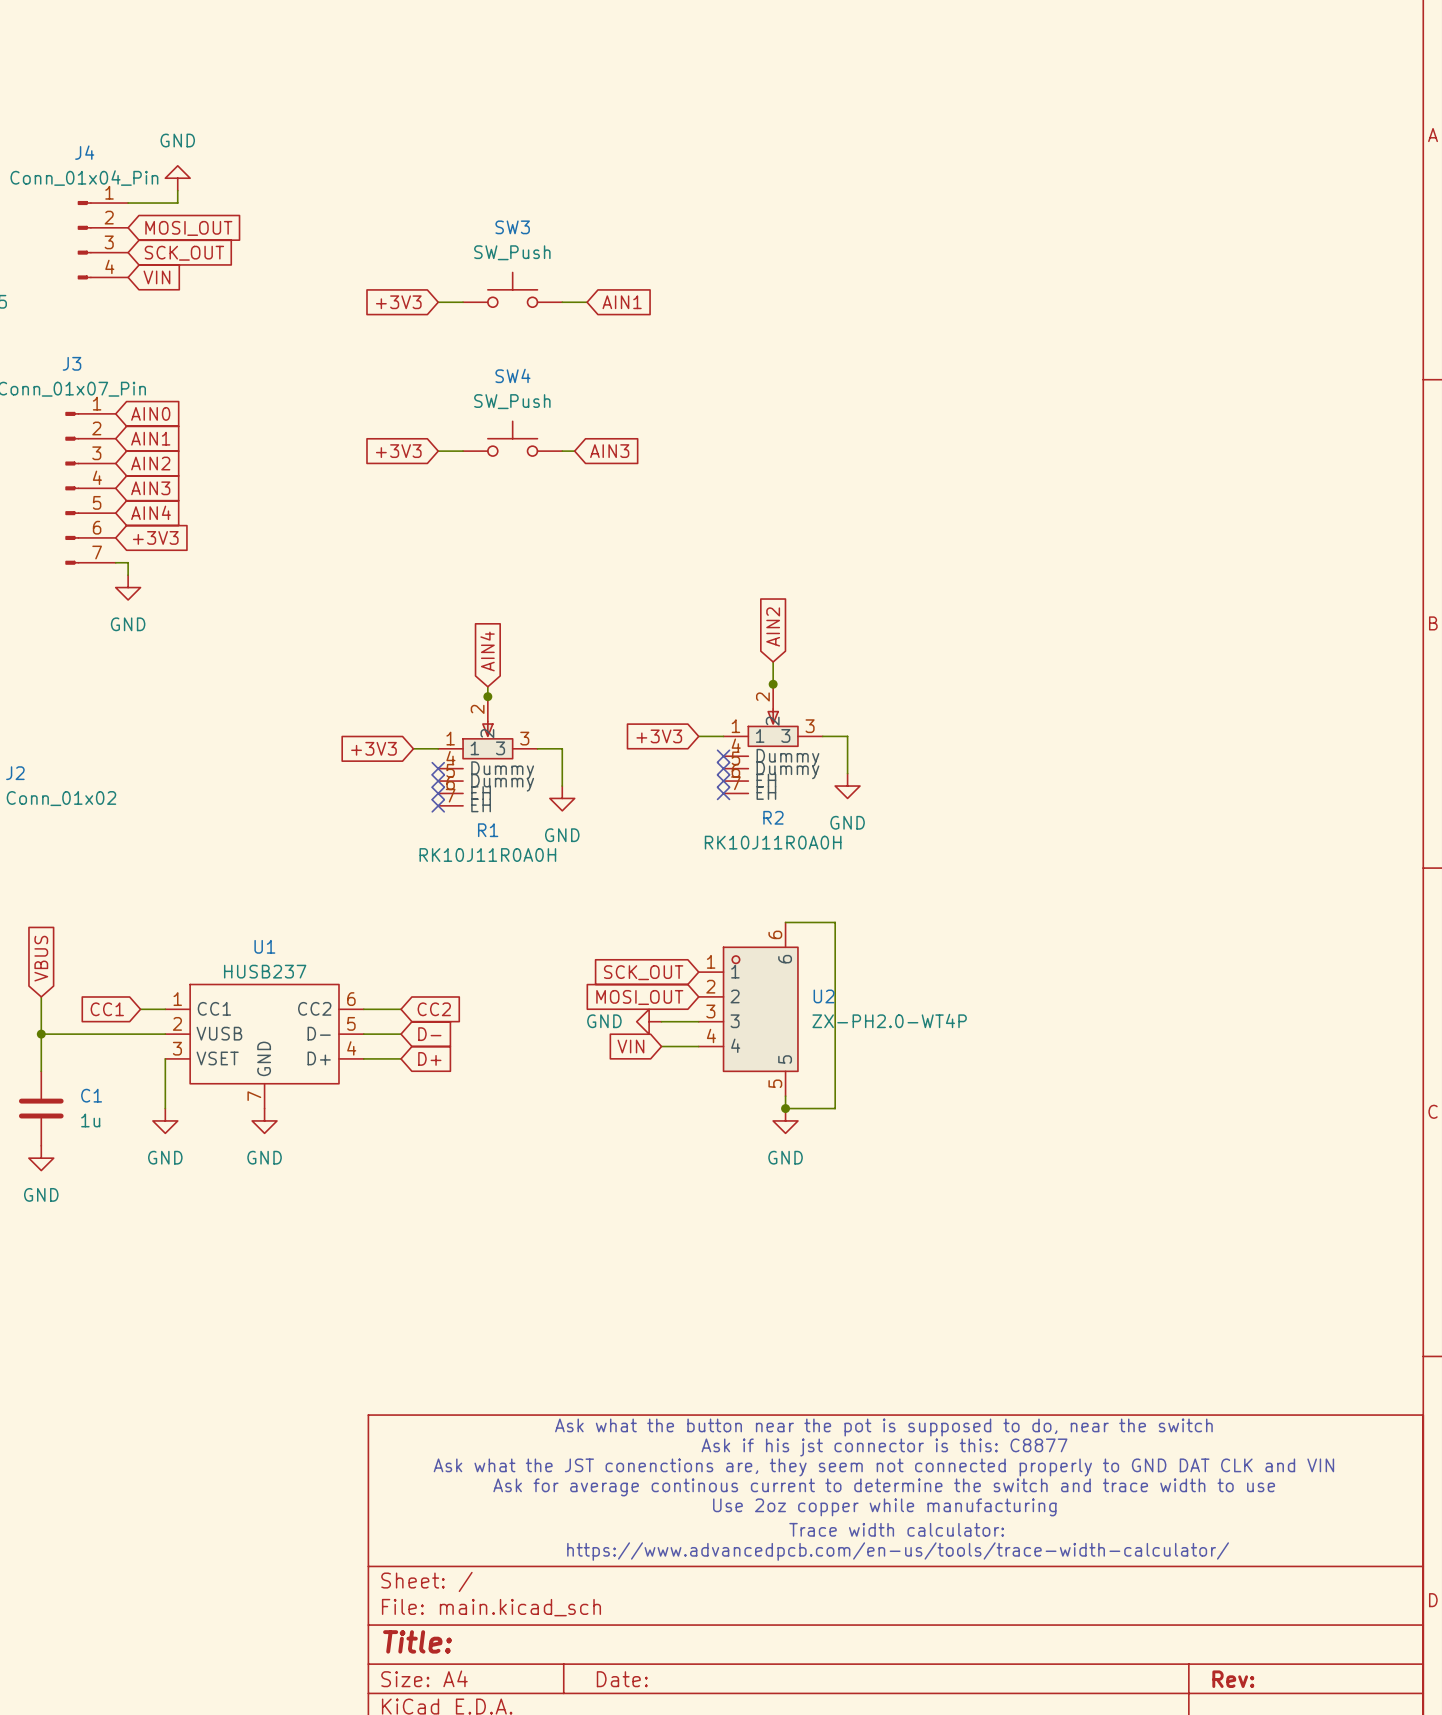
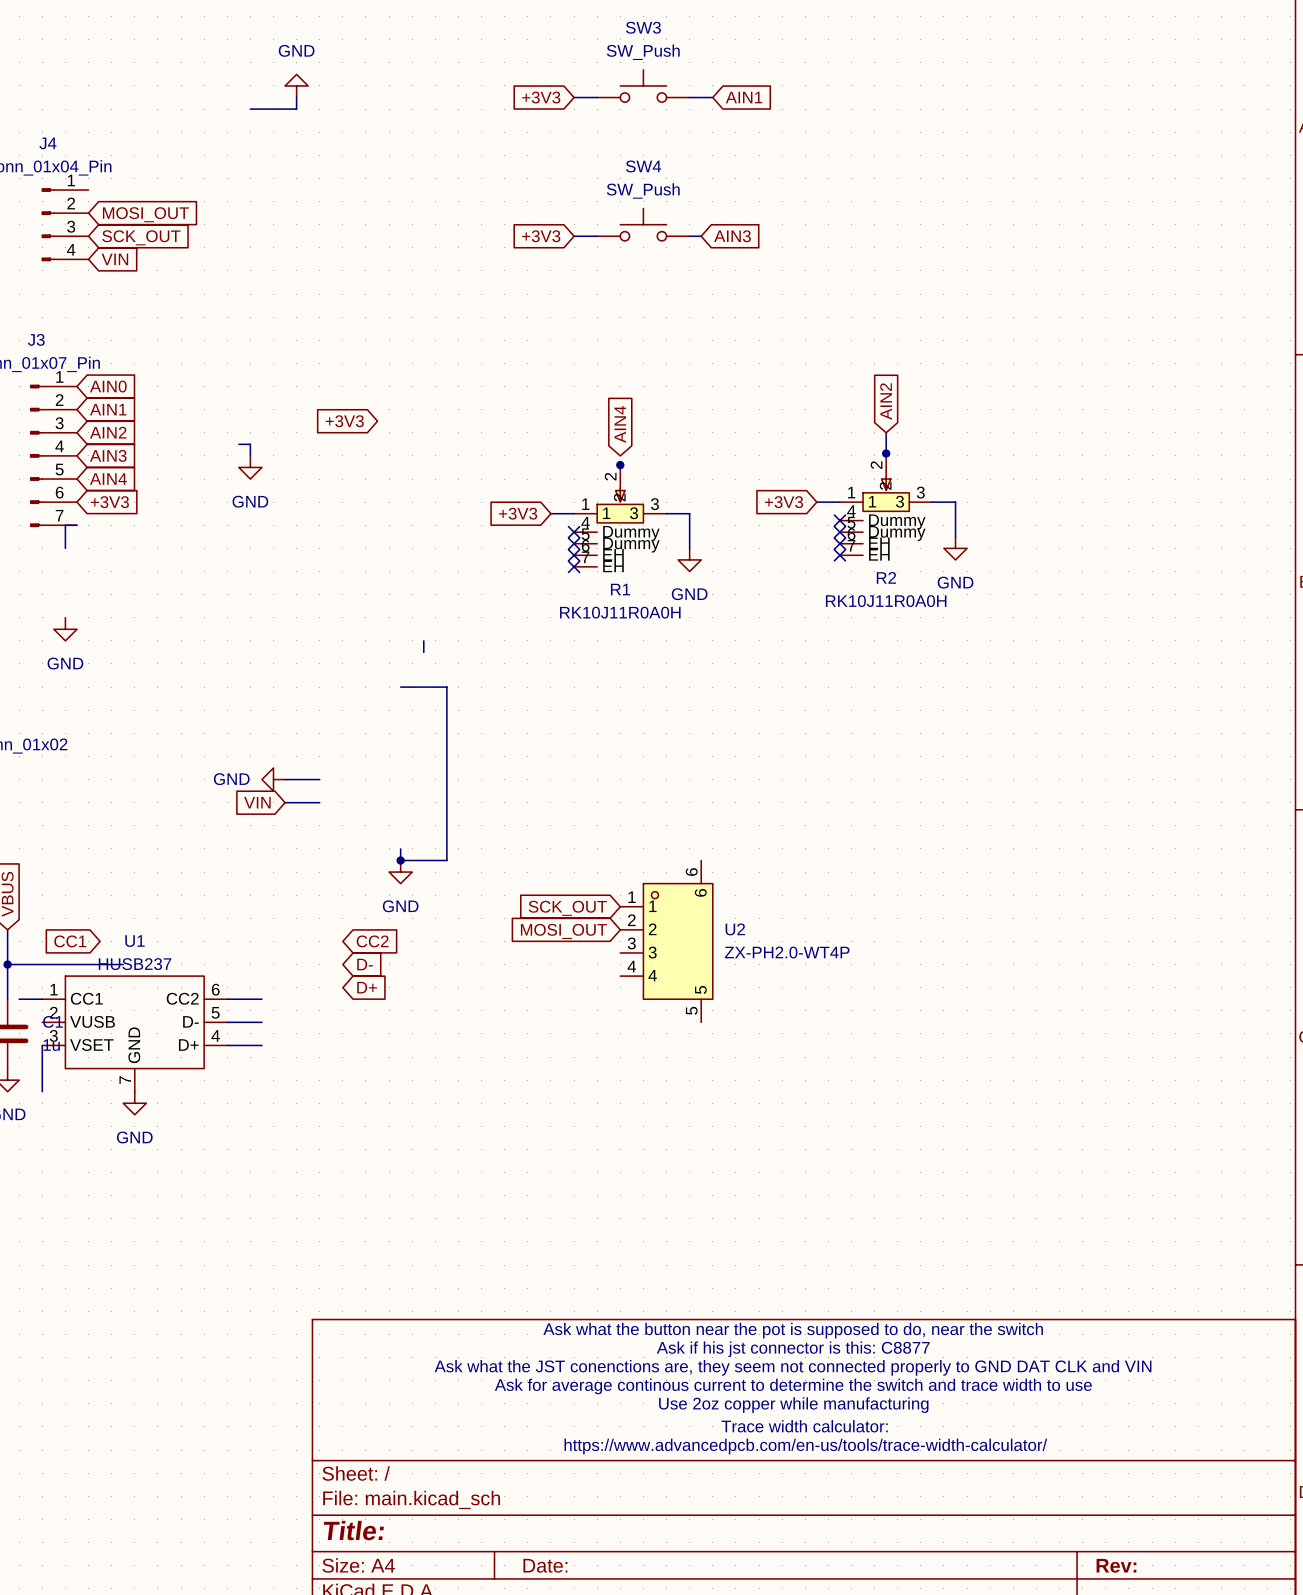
power symbol: none -> GND (296, 85)
global label: none -> +3V3 (541, 97)
wire: none -> (574, 97) (597, 97)
wire: none -> (689, 97) (712, 97)
global label: none -> AIN1 (744, 97)
power symbol: GND (177, 178) -> none
wire: (177, 190) (177, 203) (128, 203) -> (296, 97) (296, 109) (250, 109)
global label: none -> +3V3 (541, 236)
wire: none -> (689, 236) (701, 236)
global label: none -> AIN3 (732, 236)
SW3 position: (512, 289) -> (643, 85)
global label: +3V3 (398, 302) -> none
wire: (438, 302) (463, 302) -> none
wire: (562, 302) (587, 302) -> (574, 236) (597, 236)
global label: AIN1 (622, 302) -> none
global label: none -> AIN2 (886, 401)
SW4 position: (512, 438) -> (643, 224)
wire: (438, 451) (463, 451) -> none
wire: (562, 451) (574, 451) -> none
global label: AIN3 (609, 451) -> none
global label: none -> AIN4 (620, 424)
wire: none -> (886, 432) (886, 455)
wire: none -> (238, 444) (250, 444) (250, 455)
junction: none -> (886, 453)
junction: none -> (620, 465)
power symbol: none -> GND (250, 467)
global label: none -> +3V3 (783, 502)
wire: none -> (816, 502) (839, 502)
wire: none -> (932, 502) (955, 502) (955, 536)
global label: none -> +3V3 (518, 513)
no-connect mark: none -> (839, 520)
wire: (115, 562) (128, 562) (128, 575) -> (76, 525) (65, 525) (65, 548)
no-connect mark: none -> (574, 532)
no-connect mark: none -> (839, 532)
no-connect mark: none -> (574, 543)
no-connect mark: none -> (839, 543)
power symbol position: GND (128, 587) -> GND (65, 629)
power symbol: none -> GND (955, 548)
no-connect mark: none -> (574, 555)
no-connect mark: none -> (839, 555)
power symbol: none -> GND (689, 559)
no-connect mark: none -> (574, 566)
global label: AIN2 (773, 626) -> none
global label: AIN4 (487, 651) -> none
wire: (773, 661) (773, 686) -> none
junction: (773, 684) -> none
junction: (487, 696) -> none
wire: none -> (400, 687) (446, 687) (446, 860) (400, 860) (400, 848)
global label: +3V3 (659, 736) -> none
wire: (698, 736) (723, 736) -> (550, 513) (574, 513)
wire: (822, 736) (847, 736) (847, 773) -> (666, 513) (689, 513) (689, 548)
R2 position: (773, 738) -> (886, 504)
global label: +3V3 (373, 748) -> none
wire: (413, 748) (438, 748) -> none
wire: (537, 748) (562, 748) (562, 786) -> none
R1 position: (487, 751) -> (620, 515)
no-connect mark: (723, 756) -> none
no-connect mark: (438, 768) -> none
no-connect mark: (723, 768) -> none
no-connect mark: (438, 781) -> none
no-connect mark: (723, 781) -> none
power symbol: GND (847, 786) -> none
no-connect mark: (438, 793) -> none
no-connect mark: (723, 793) -> none
power symbol: GND (562, 798) -> none
no-connect mark: (438, 805) -> none
power symbol: none -> GND (273, 779)
wire: none -> (285, 779) (319, 779)
global label: none -> VIN (257, 802)
wire: none -> (285, 802) (319, 802)
junction: none -> (400, 860)
wire: (785, 922) (835, 922) (835, 1108) (785, 1108) (785, 1096) -> none
power symbol: none -> GND (400, 872)
wire: (140, 1009) (165, 1009) -> (19, 999) (42, 999)
wire: (363, 1009) (401, 1009) -> (227, 999) (261, 999)
power symbol: GND (649, 1021) -> none
wire: (661, 1021) (698, 1021) -> none
wire: (363, 1034) (401, 1034) -> (227, 1022) (261, 1022)
U1 position: (264, 1046) -> (134, 1033)
global label: VIN (630, 1046) -> none
wire: (661, 1046) (698, 1046) -> none
wire: (165, 1058) (165, 1108) -> (42, 1045) (42, 1091)
wire: (363, 1058) (401, 1058) -> (227, 1045) (261, 1045)
junction: (785, 1108) -> none
power symbol: GND (165, 1120) -> none
power symbol: GND (264, 1120) -> none
power symbol: GND (785, 1120) -> none
power symbol: none -> GND (134, 1103)

